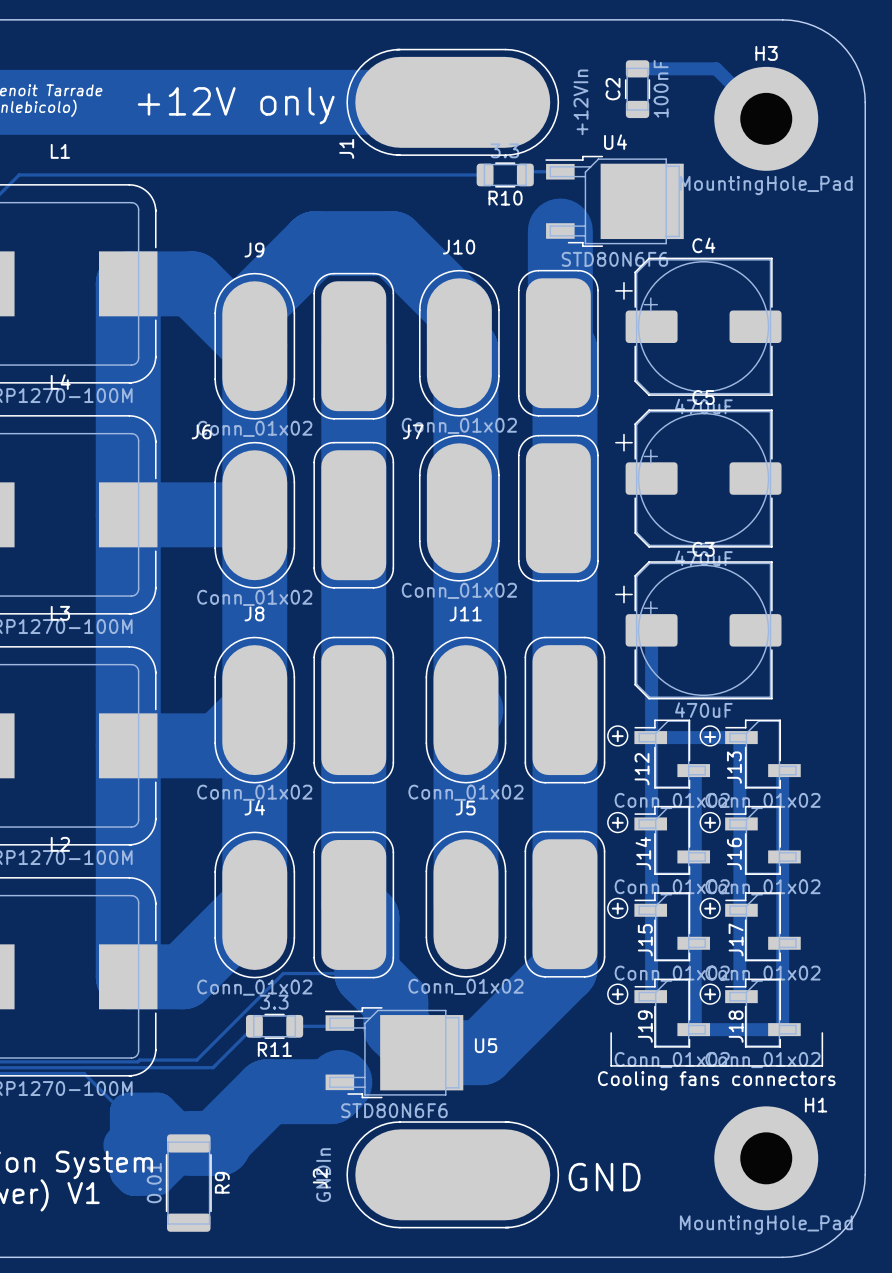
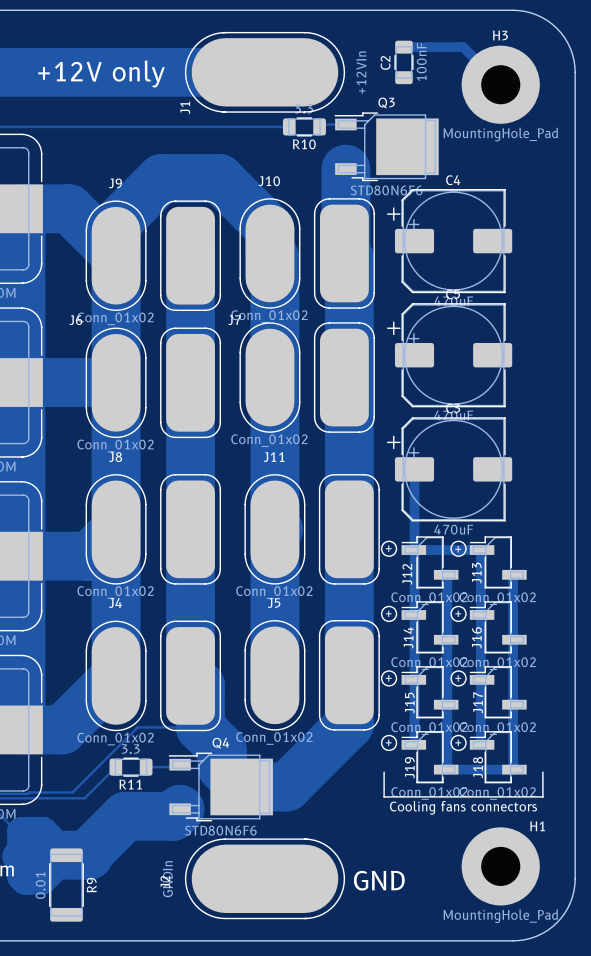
U4 name: U4 (615, 142) -> Q3 (386, 102)
U5 name: U5 (486, 1045) -> Q4 (220, 743)

